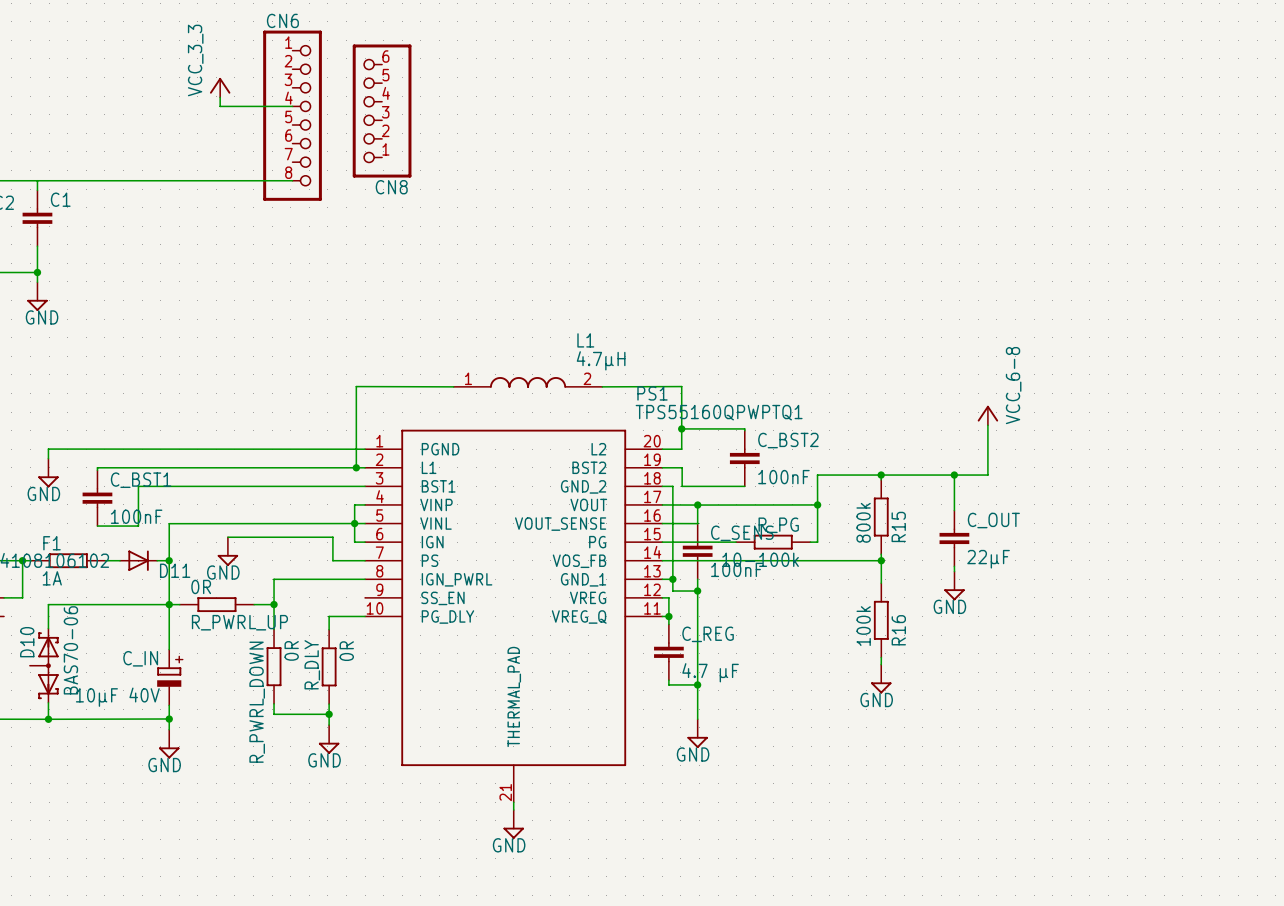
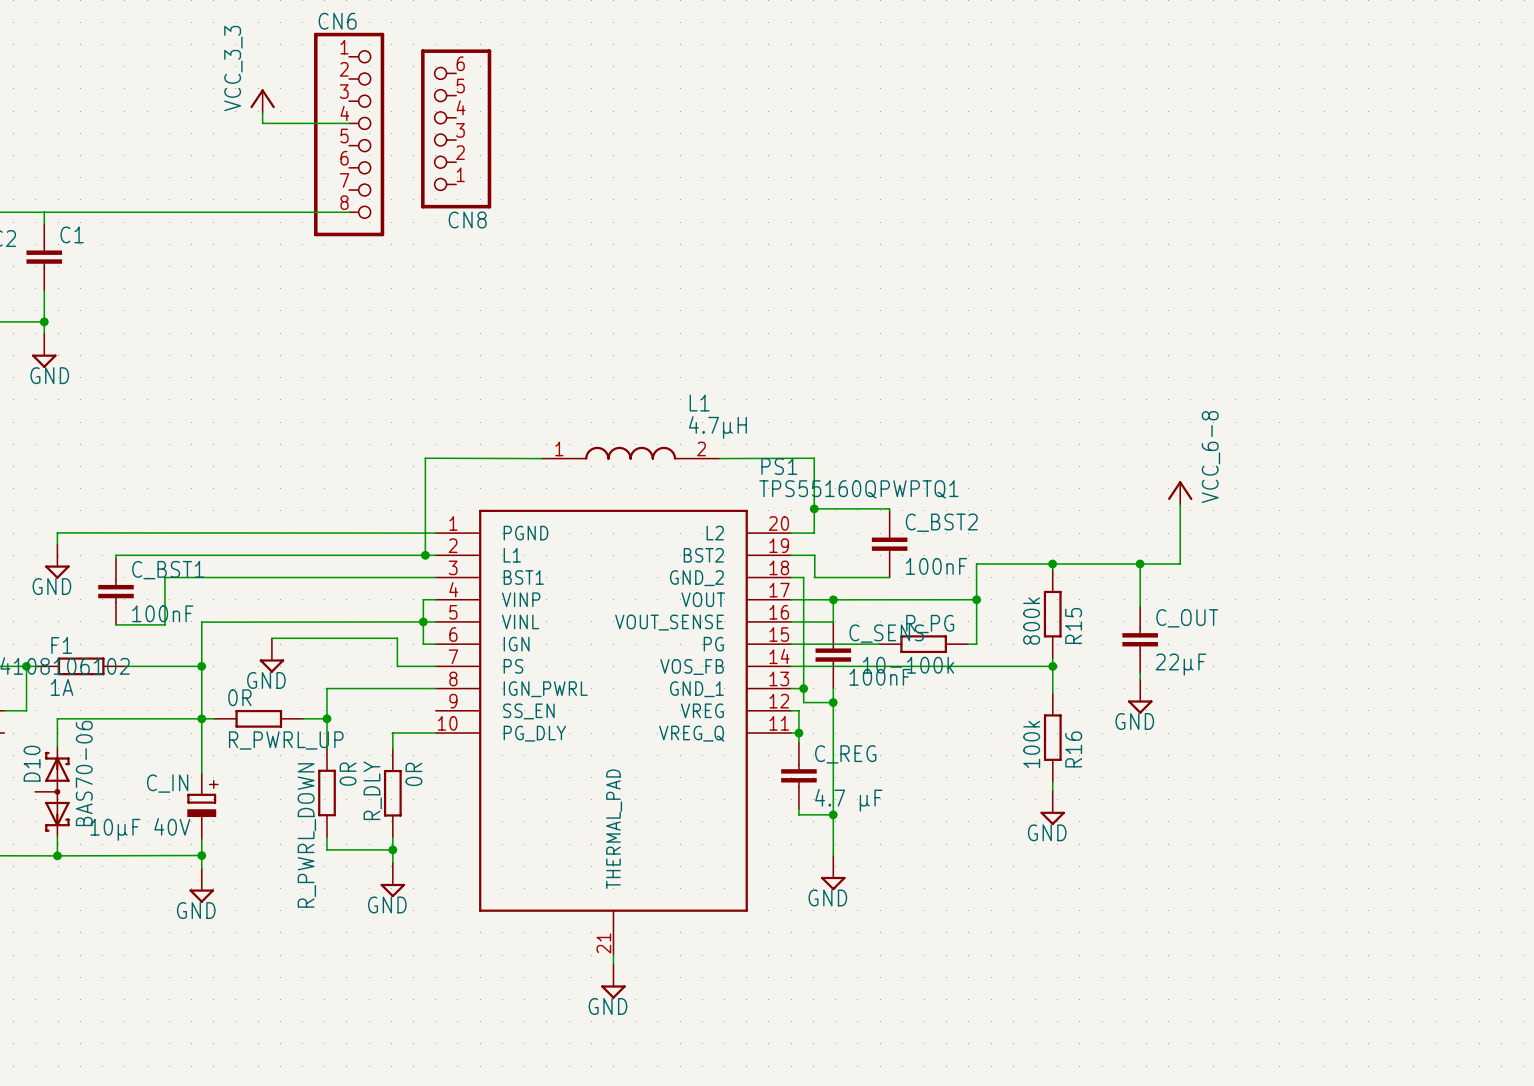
D11: (138, 560) -> none

